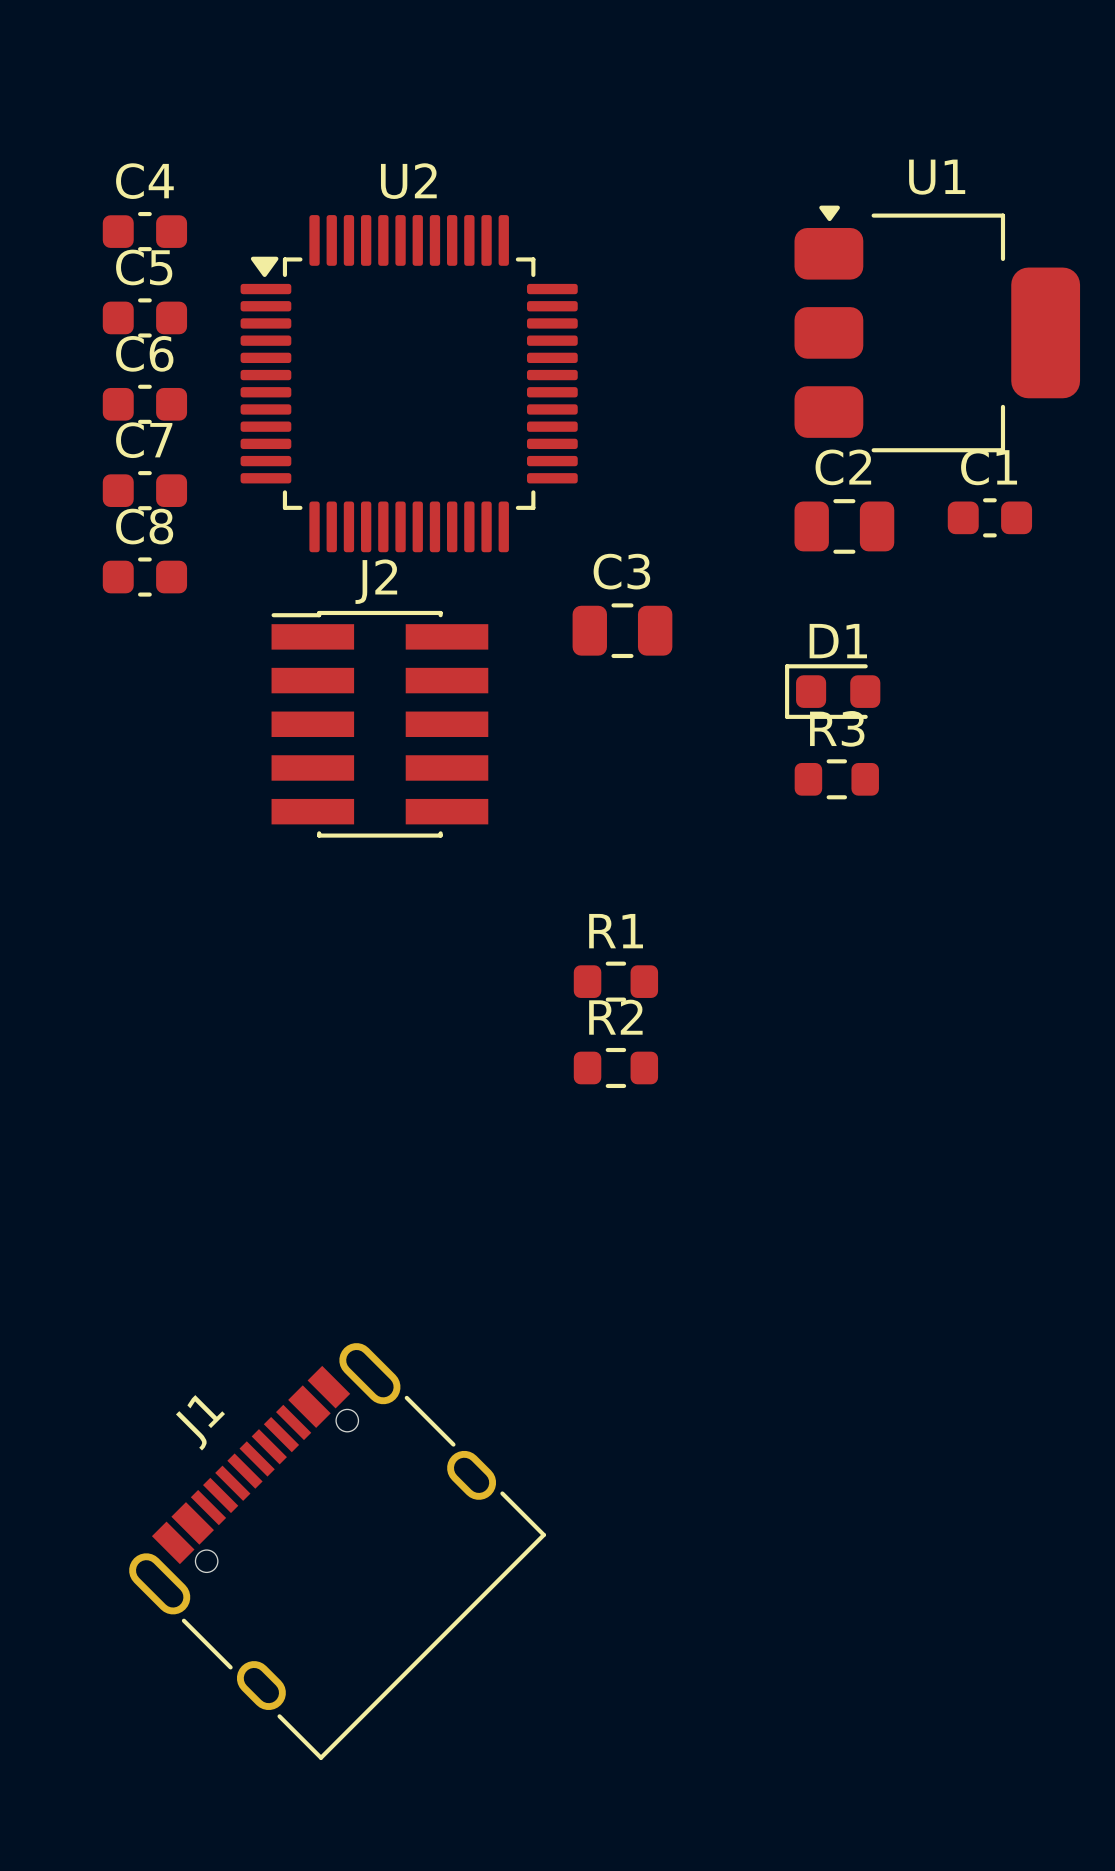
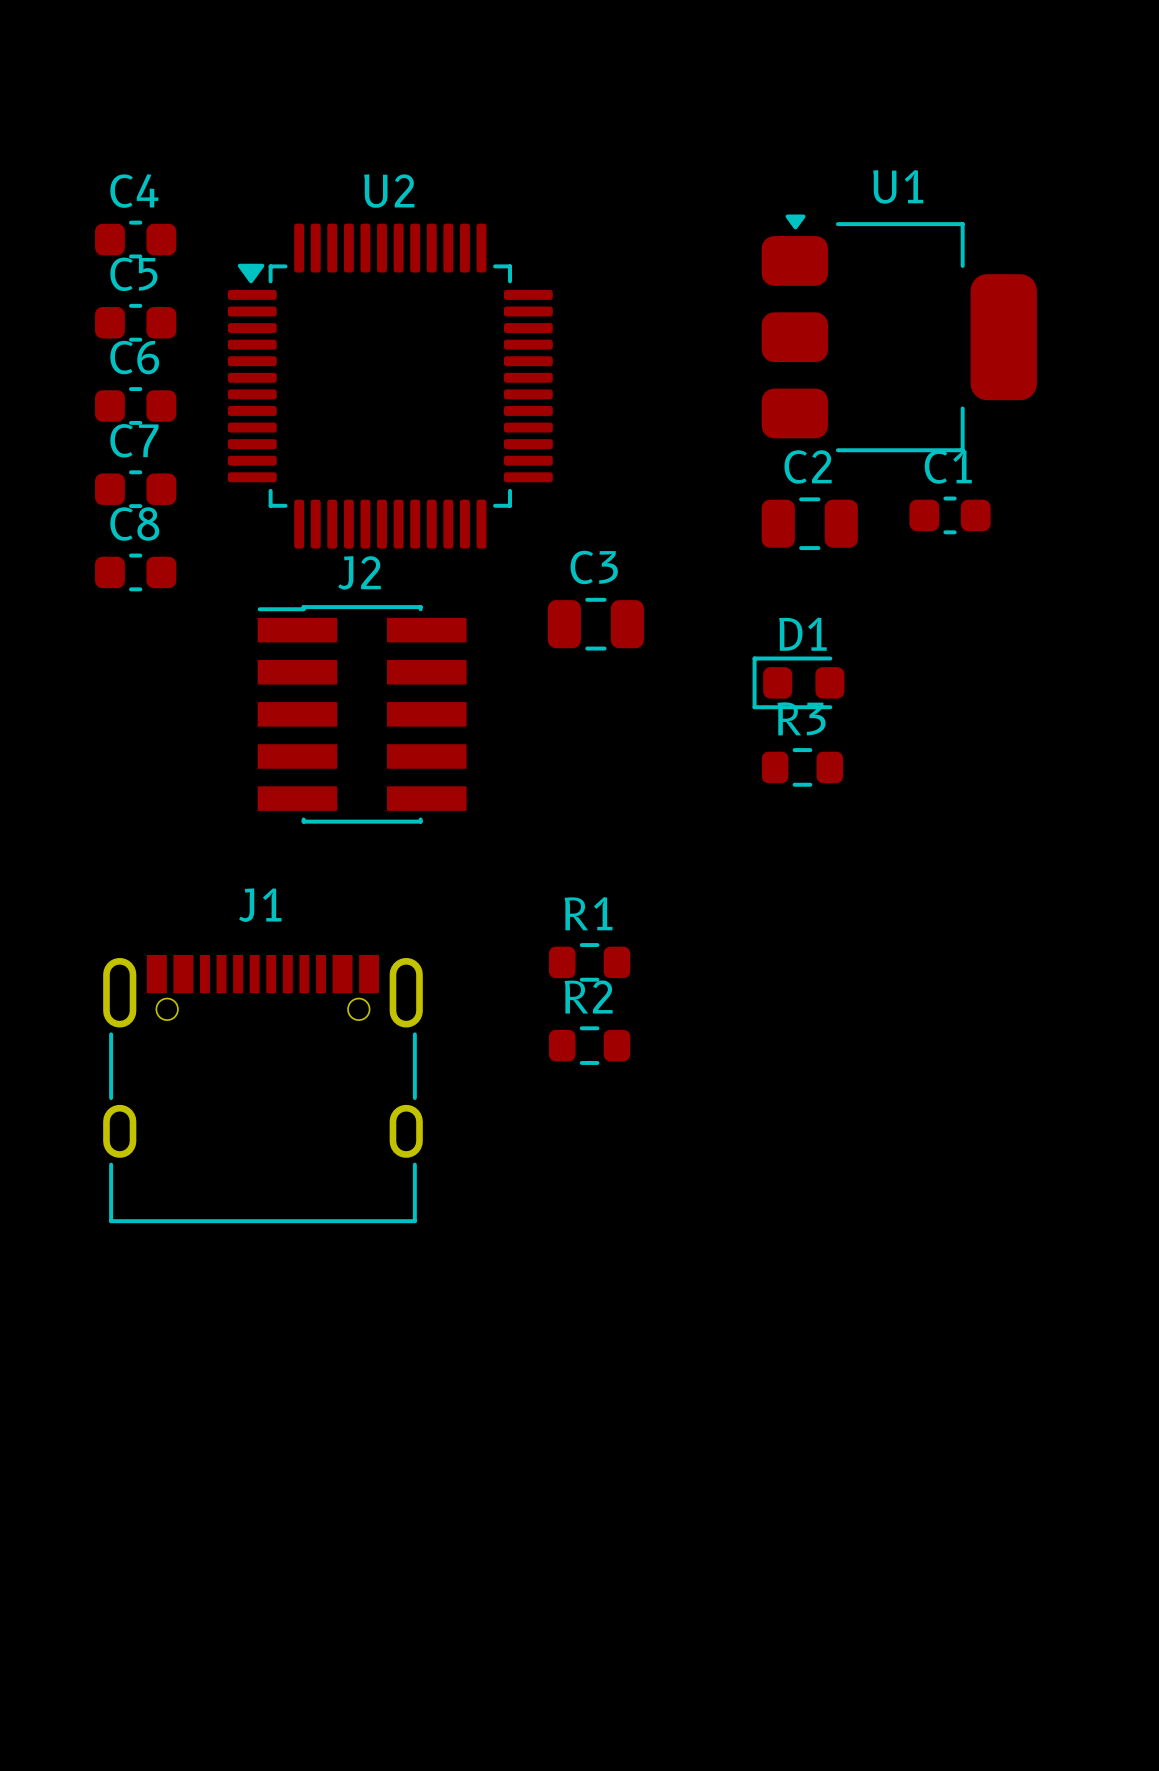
J1 rotation: 0° (337, 1551) -> 45° clockwise (262, 1089)
J1 position: (337, 1551) -> (262, 1089)

